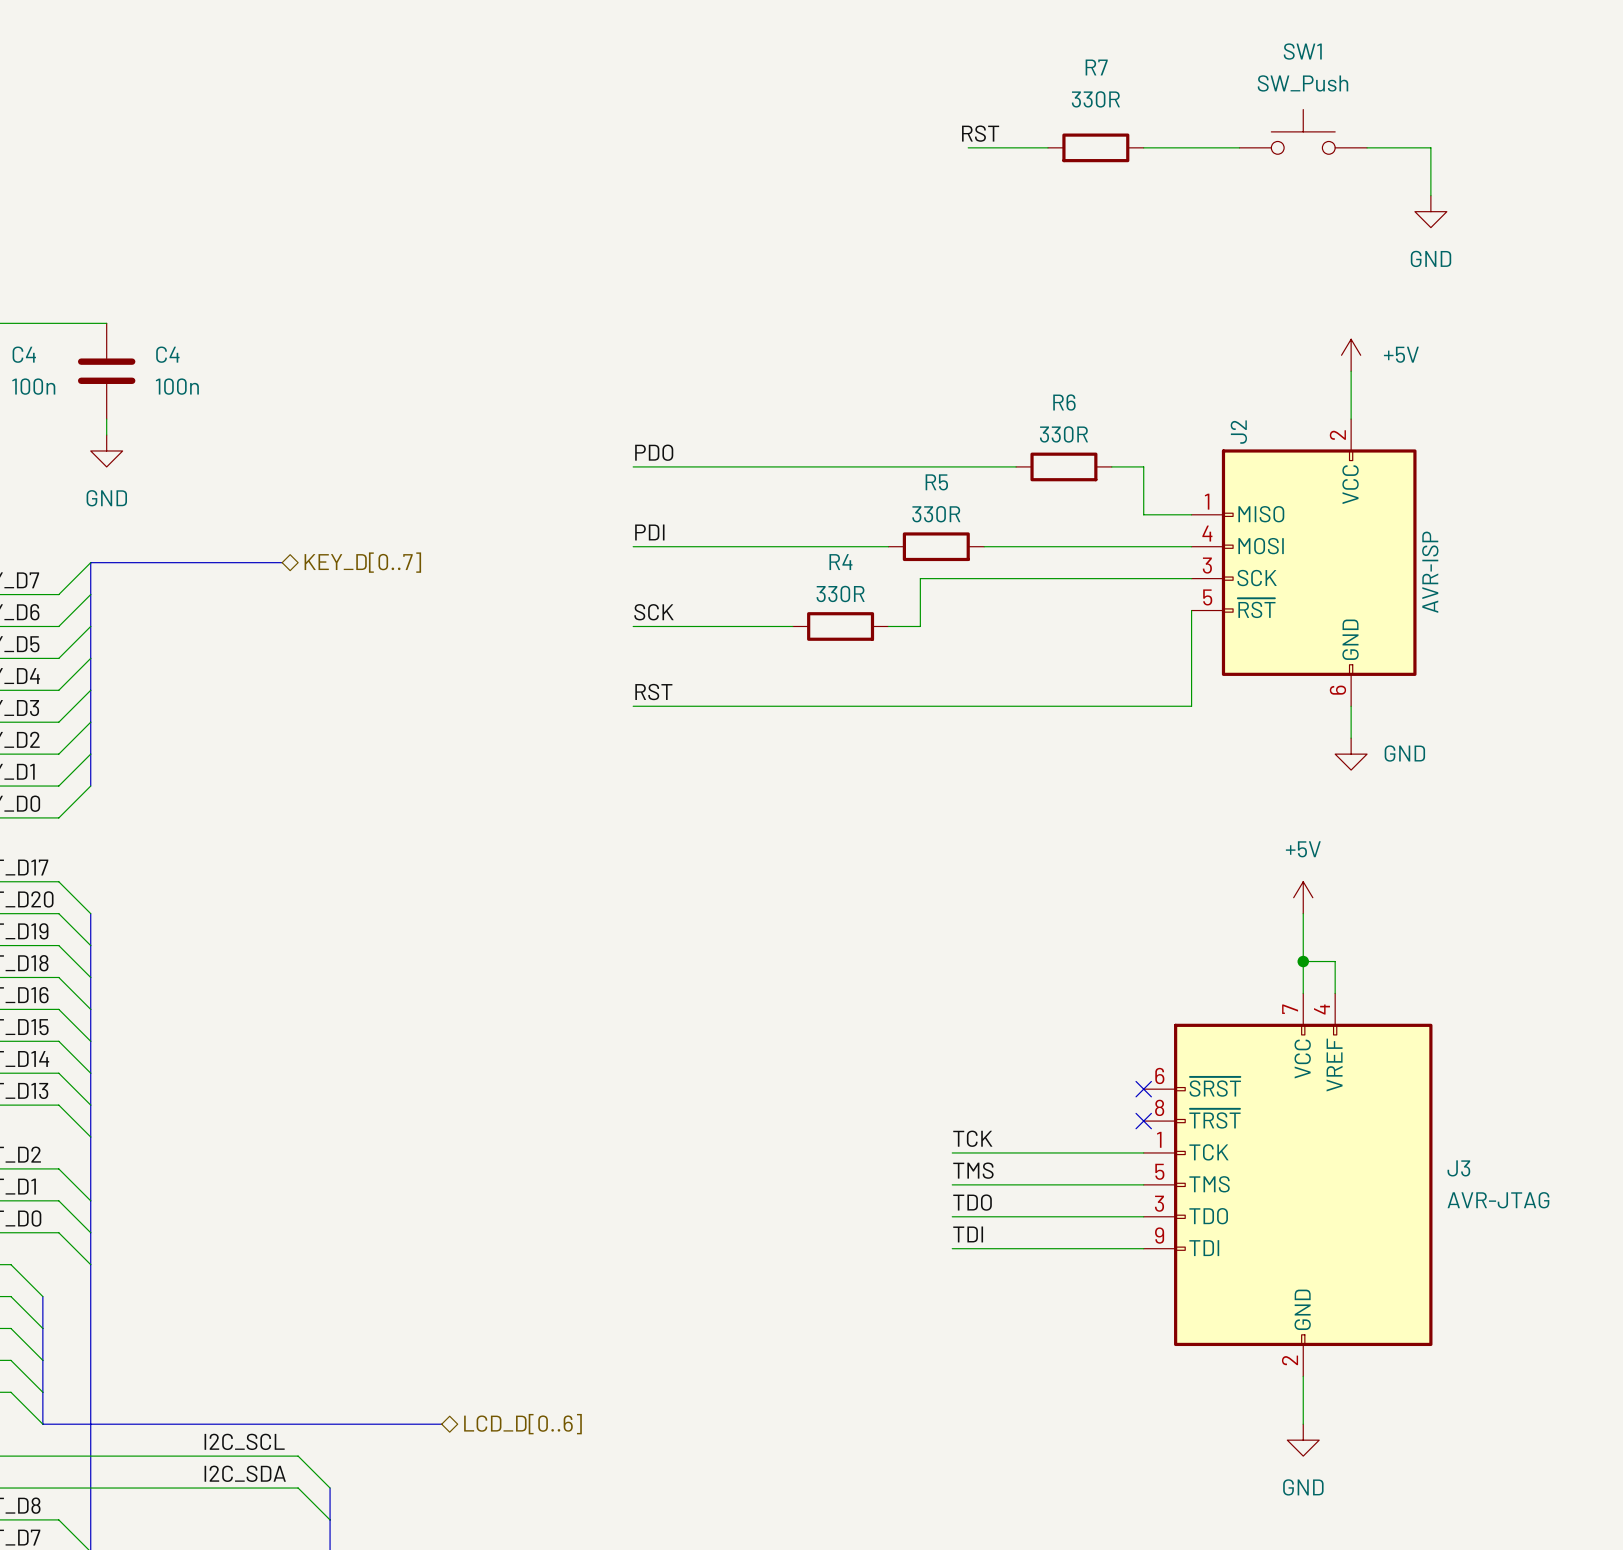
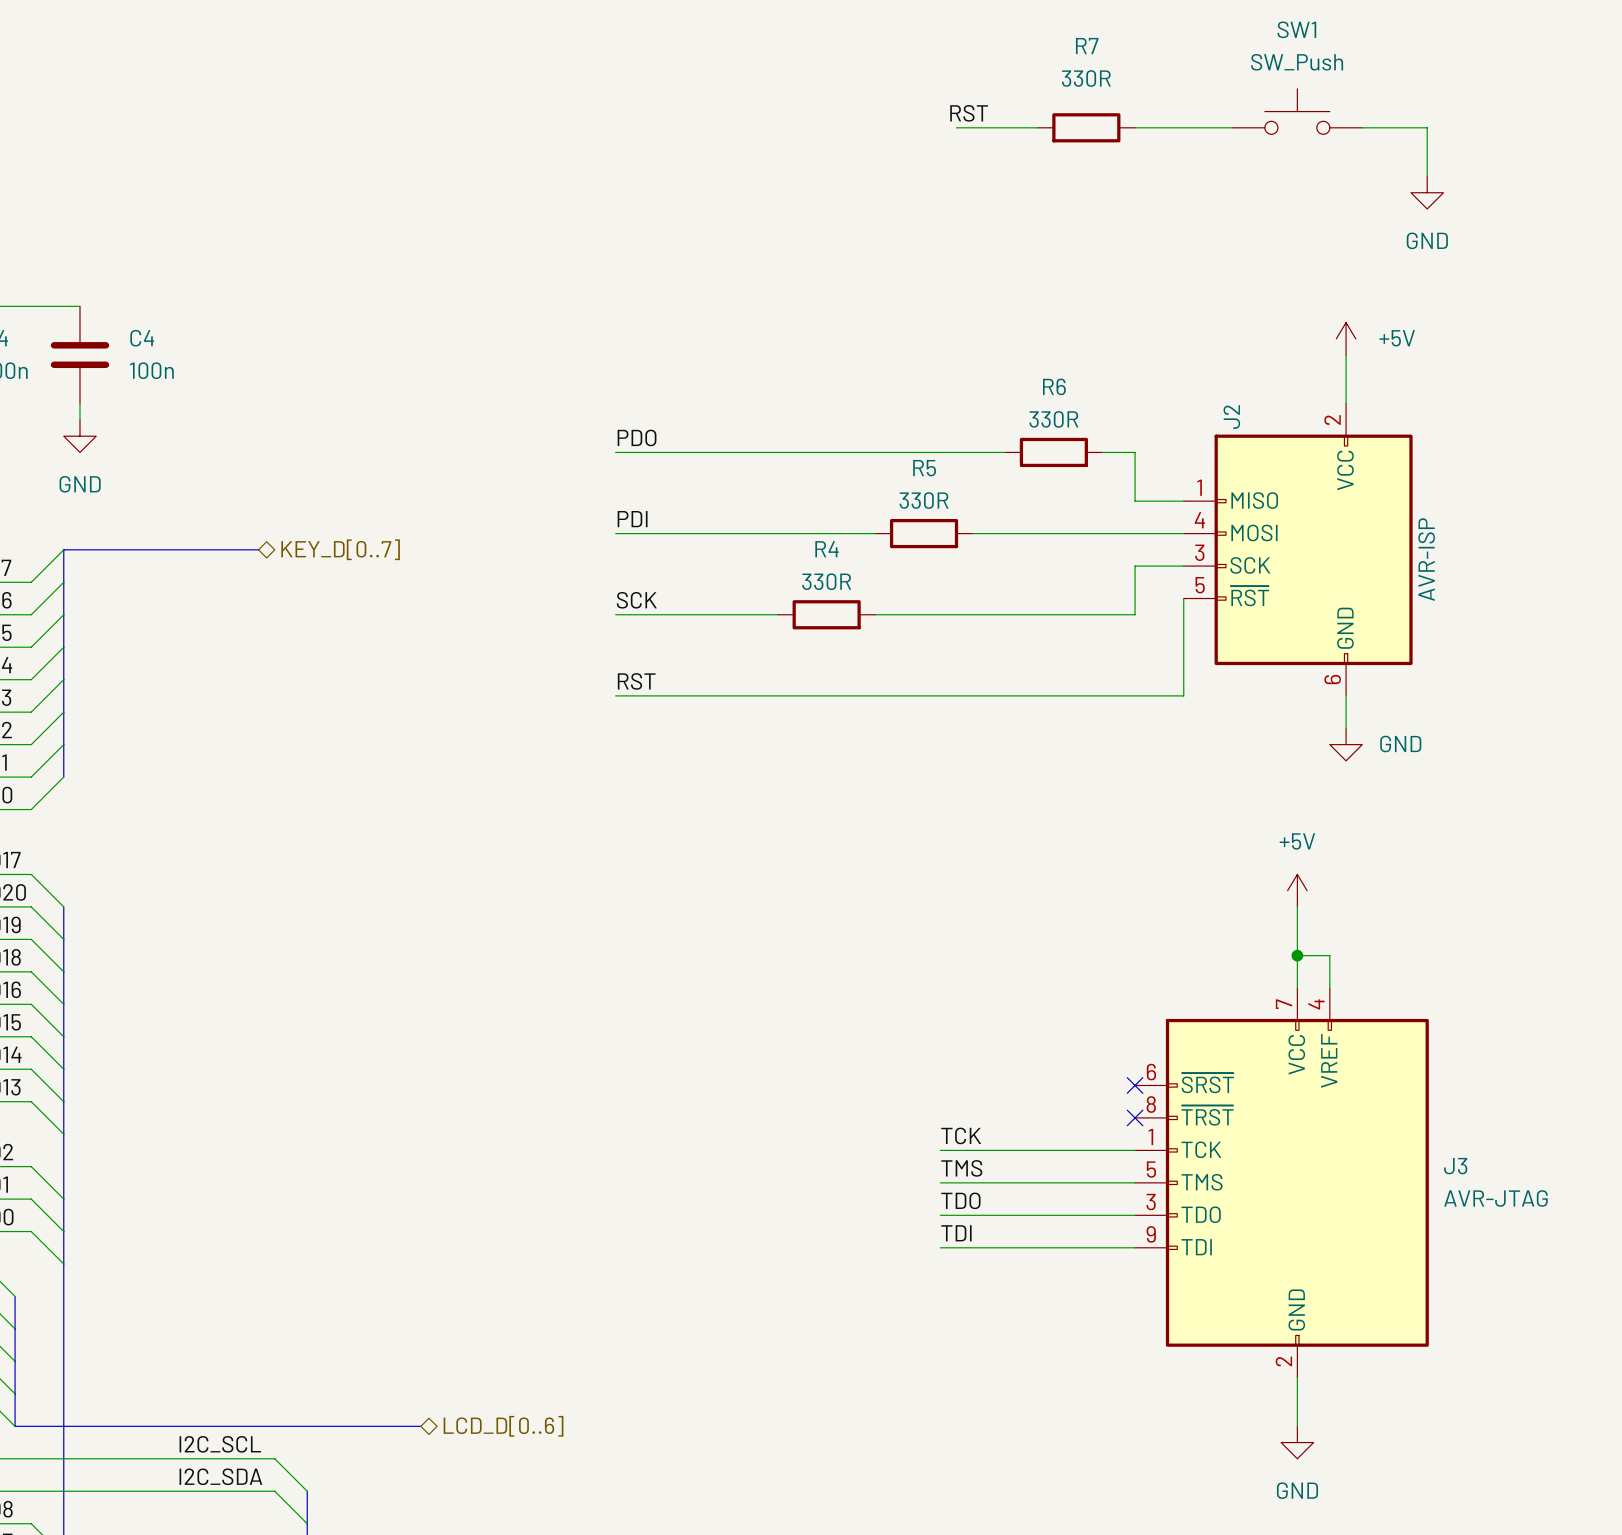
wire: (1143, 578) (920, 578) (920, 626) -> (1135, 566) (1135, 614) (907, 614)

